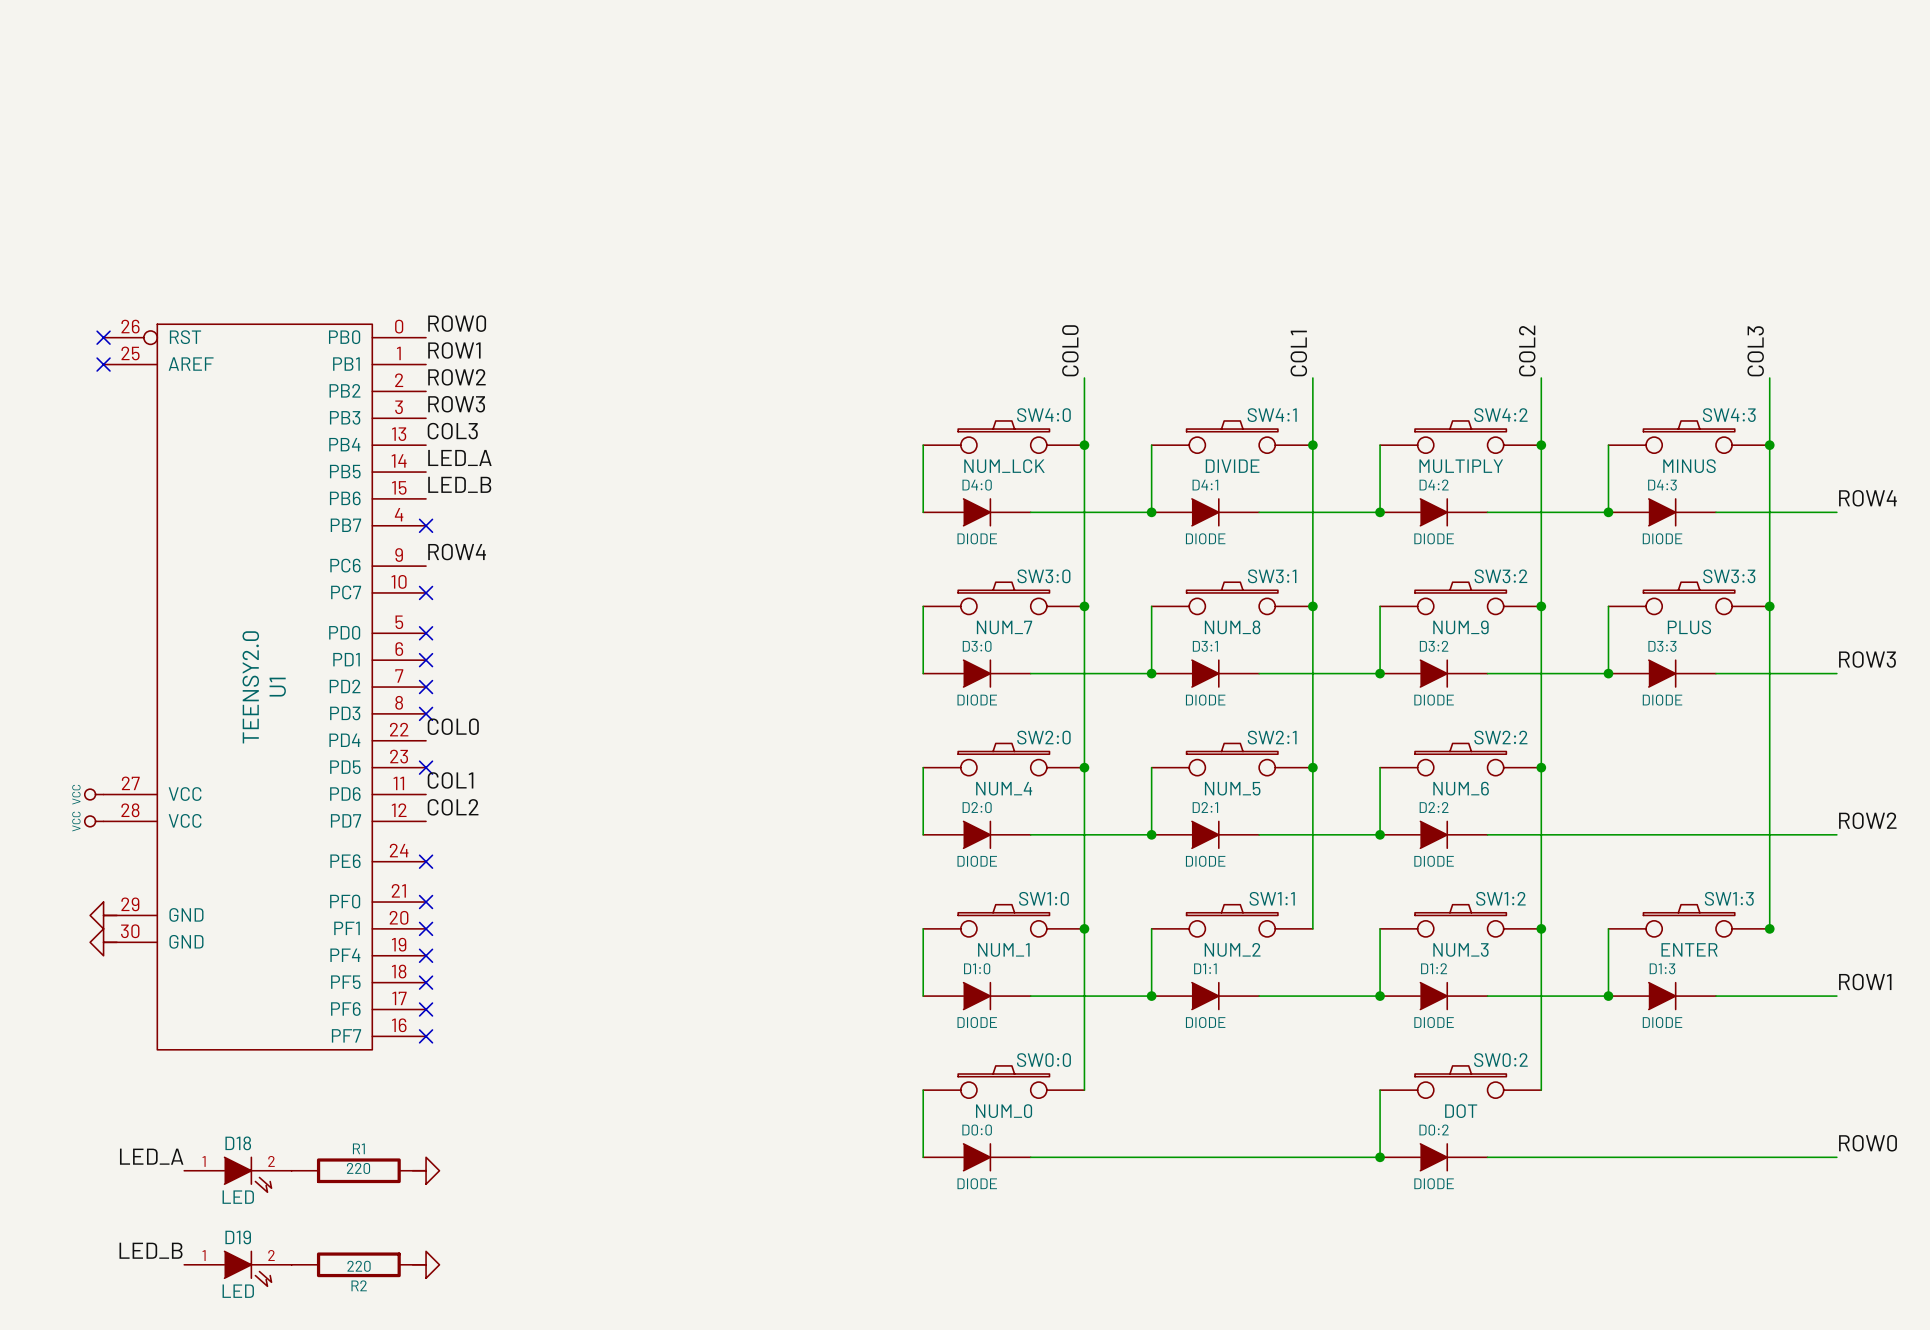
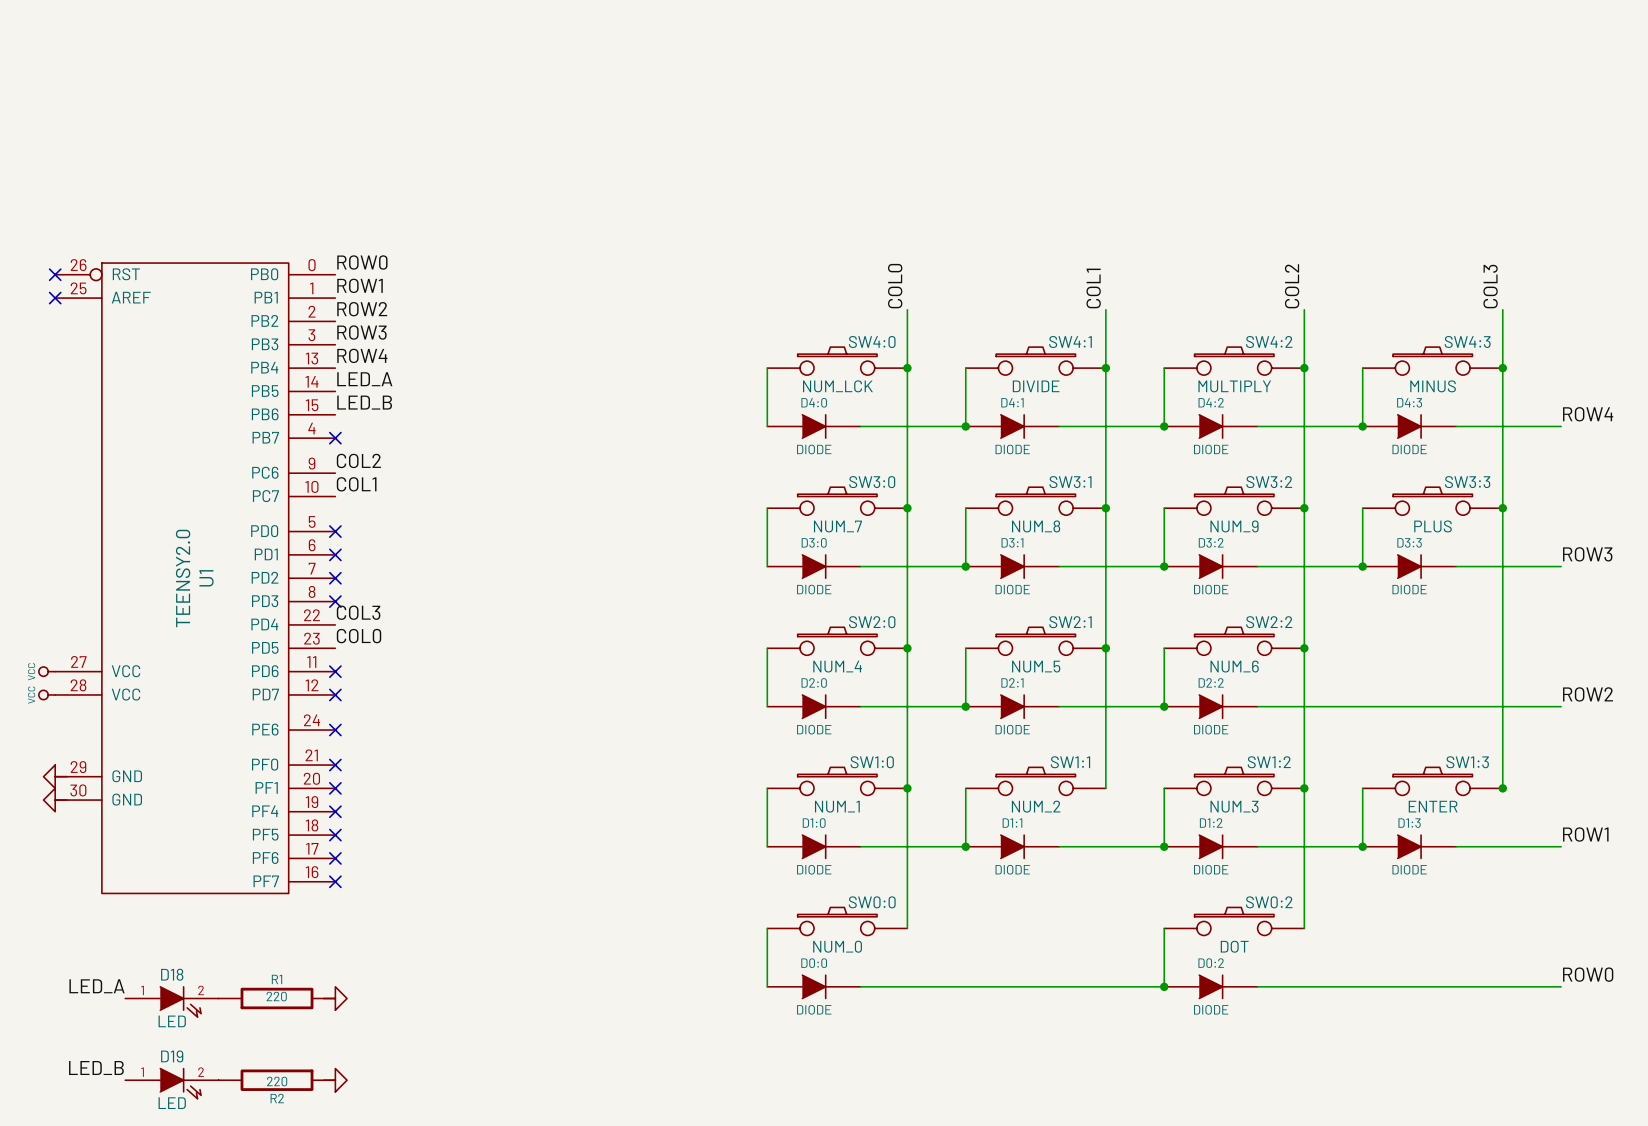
label: COL3 (452, 431) -> ROW4 (362, 355)
label: ROW4 (457, 552) -> COL2 (358, 460)
no-connect mark: (426, 592) -> none
label: COL0 (453, 726) -> COL3 (358, 612)
label: none -> COL0 (359, 636)
no-connect mark: (426, 767) -> none
label position: COL1 (450, 780) -> COL1 (356, 484)
no-connect mark: none -> (335, 671)
label: COL2 (453, 807) -> none
no-connect mark: none -> (335, 694)

